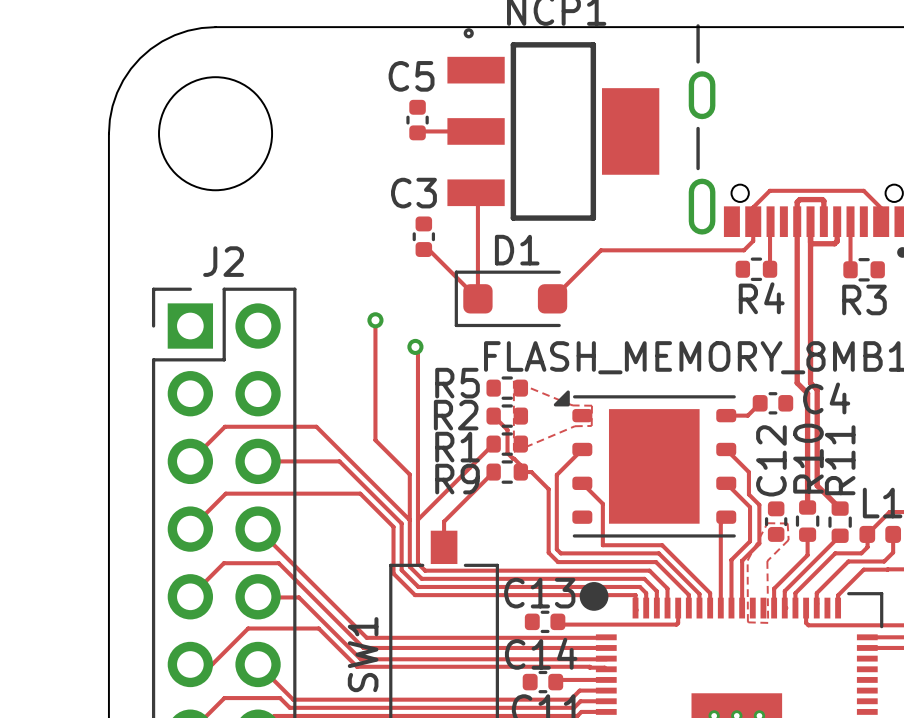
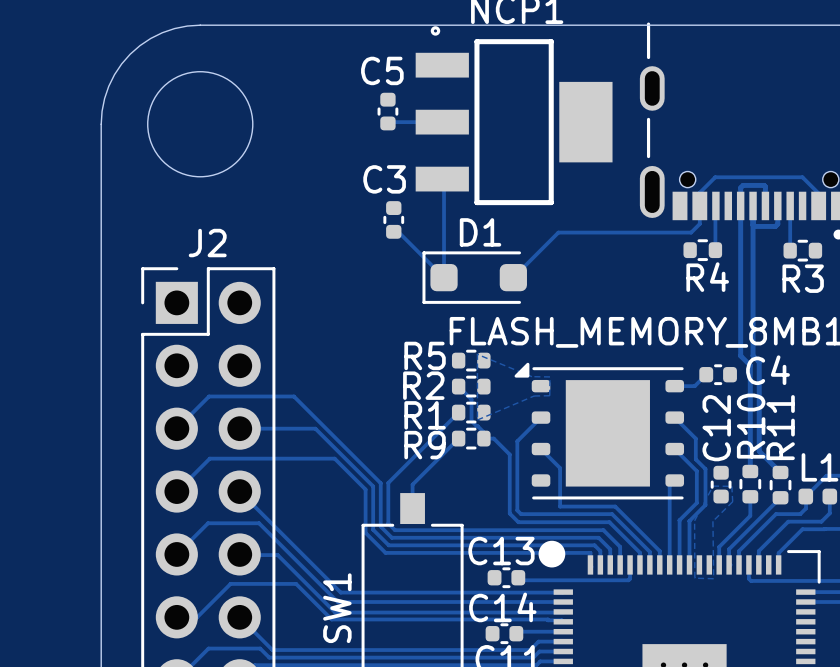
track: (375, 320) (375, 440) (409, 474) (409, 520) -> none
via: (375, 320) -> none
track: (415, 346) (417, 349) (417, 519) -> none
via: (415, 346) -> none

